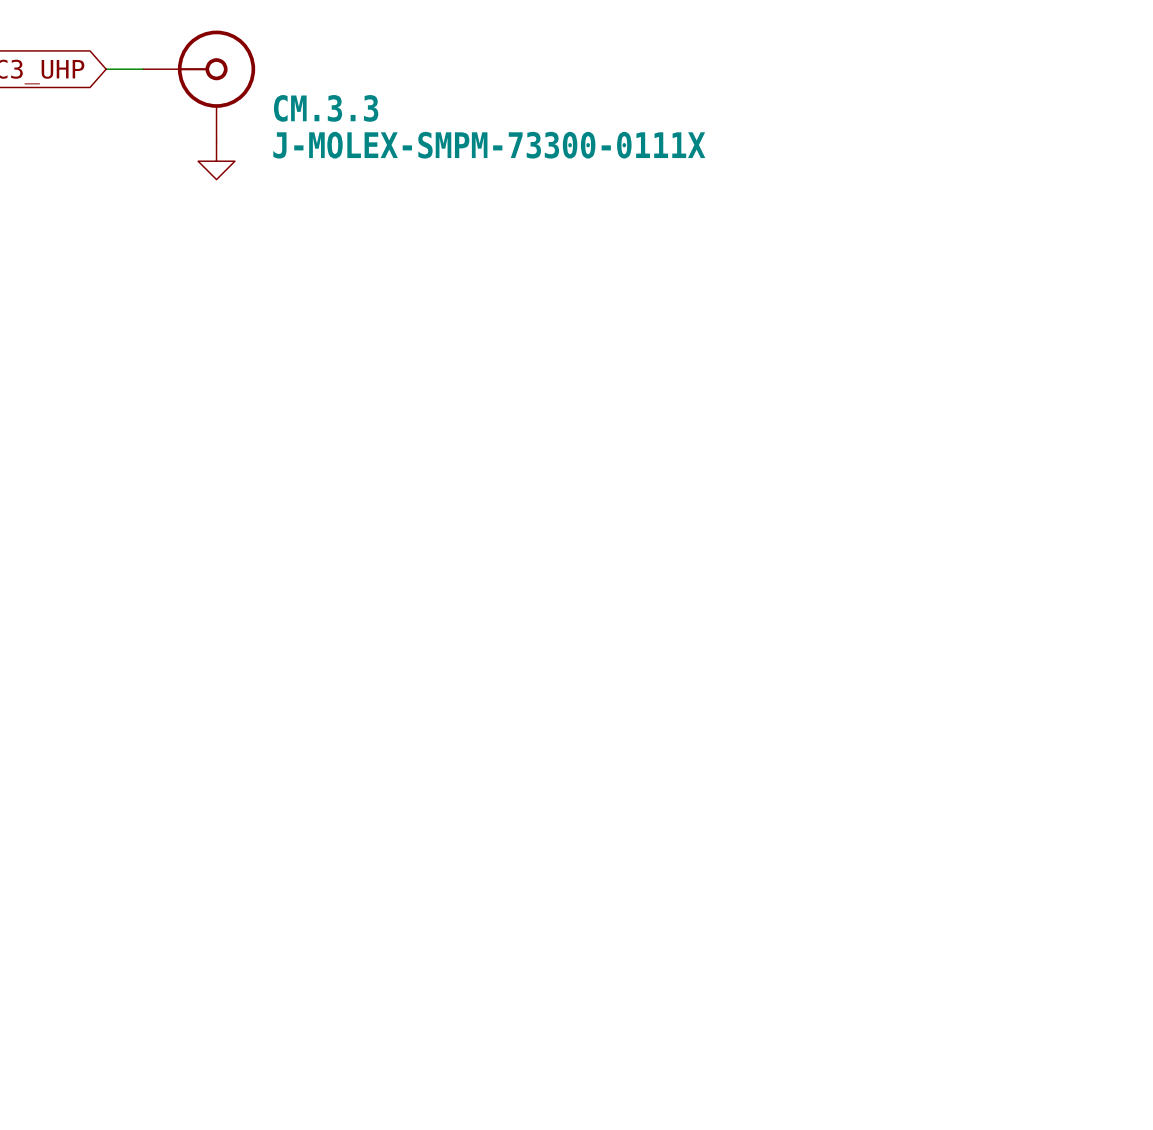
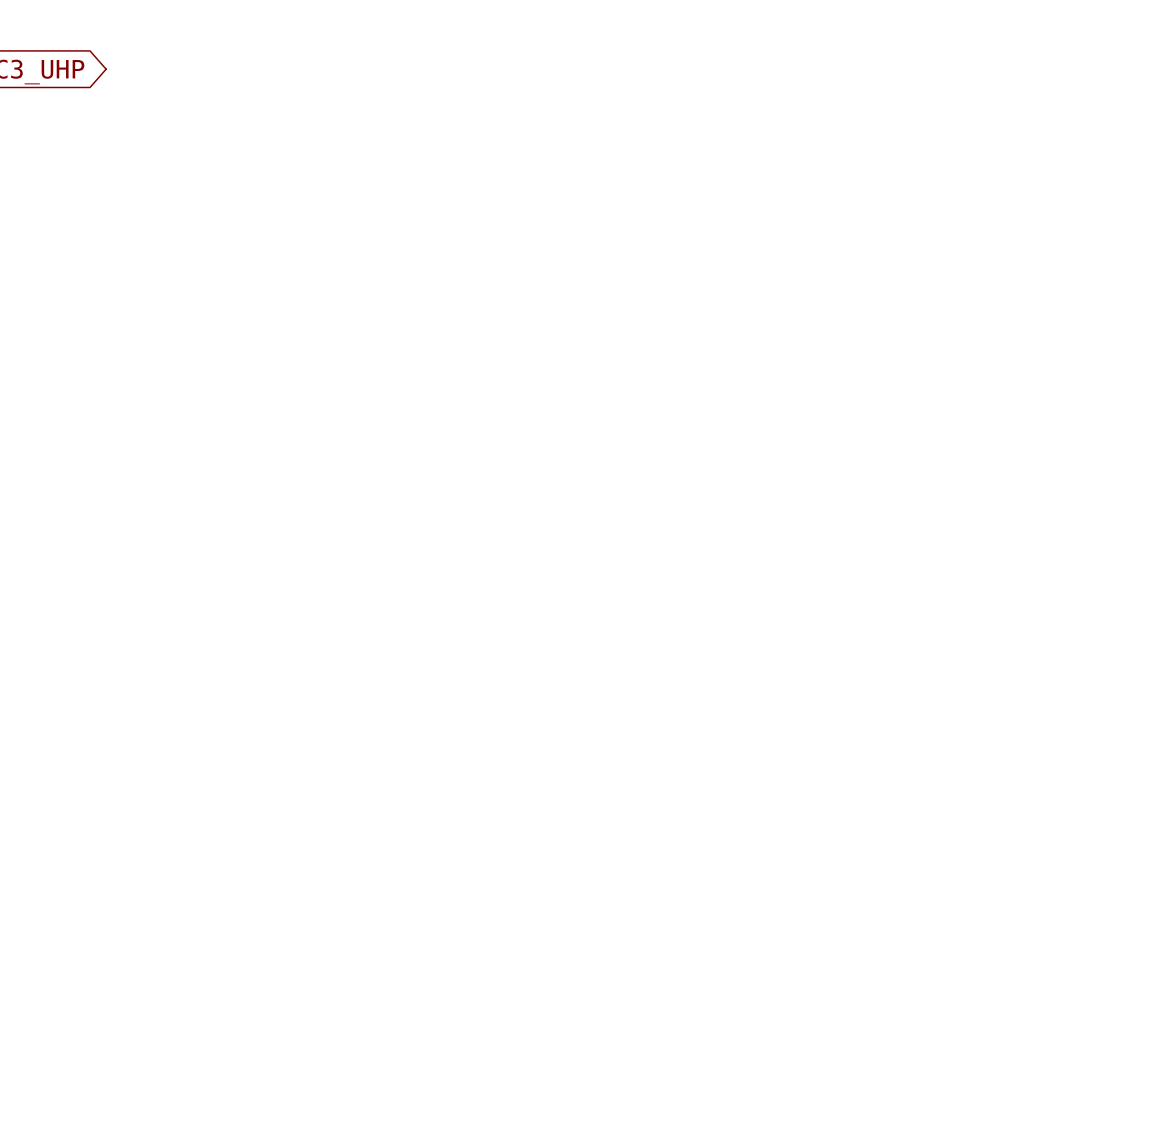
wire: (106, 69) (142, 69) -> none
CM.3.3: J-MOLEX-SMPM-73300-0111X (199, 86) -> none
power symbol: (216, 161) -> none

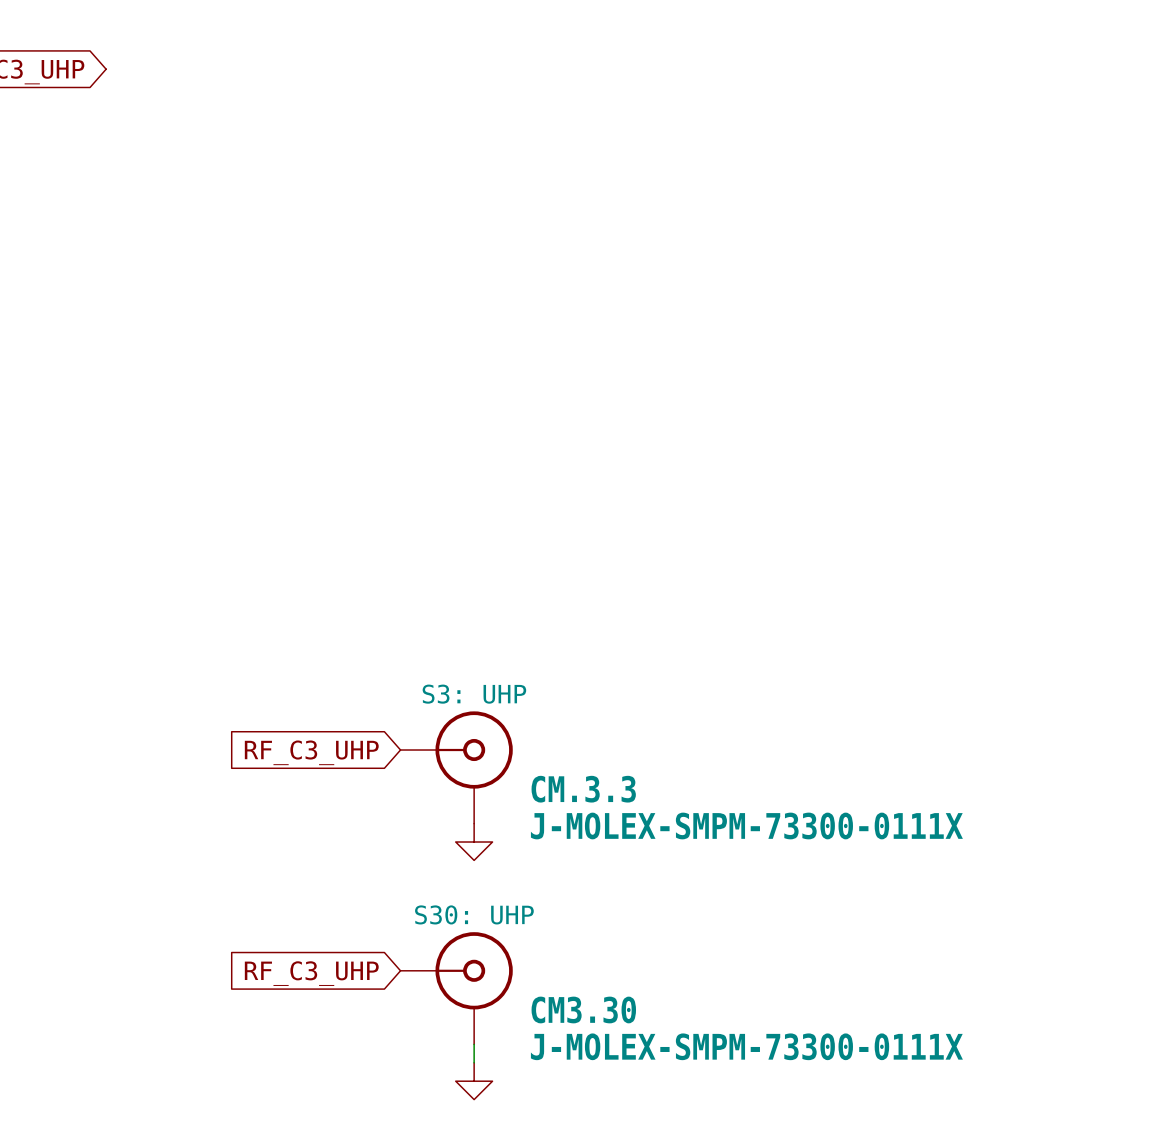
global label: none -> RF_C3_UHP (311, 752)
CM.3.3: none -> J-MOLEX-SMPM-73300-0111X (456, 767)
power symbol: none -> (474, 842)
global label: none -> RF_C3_UHP (311, 973)
CM3.30: none -> J-MOLEX-SMPM-73300-0111X (456, 988)
wire: none -> (474, 1044) (474, 1062)
power symbol: none -> (474, 1081)

